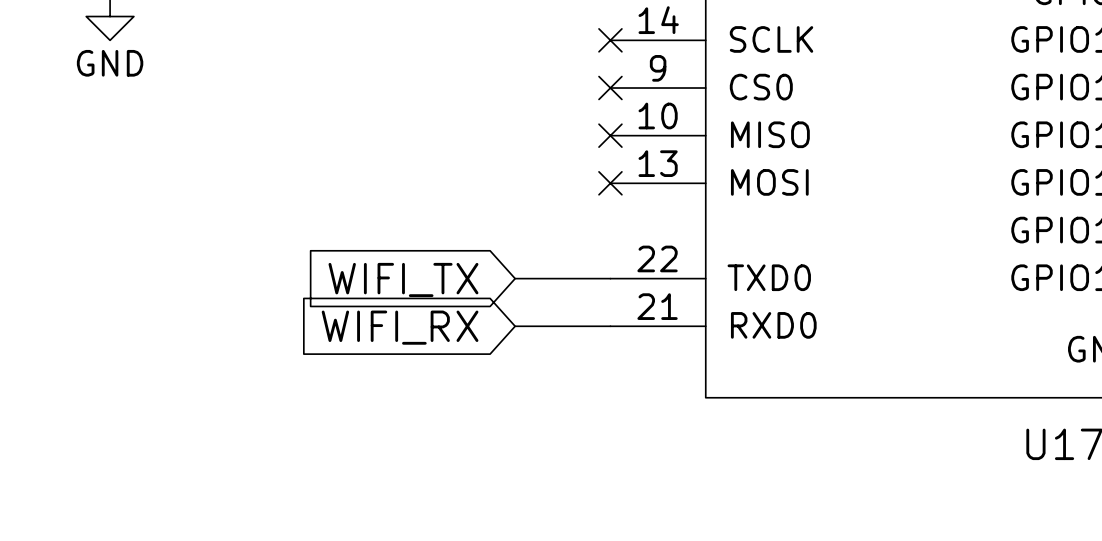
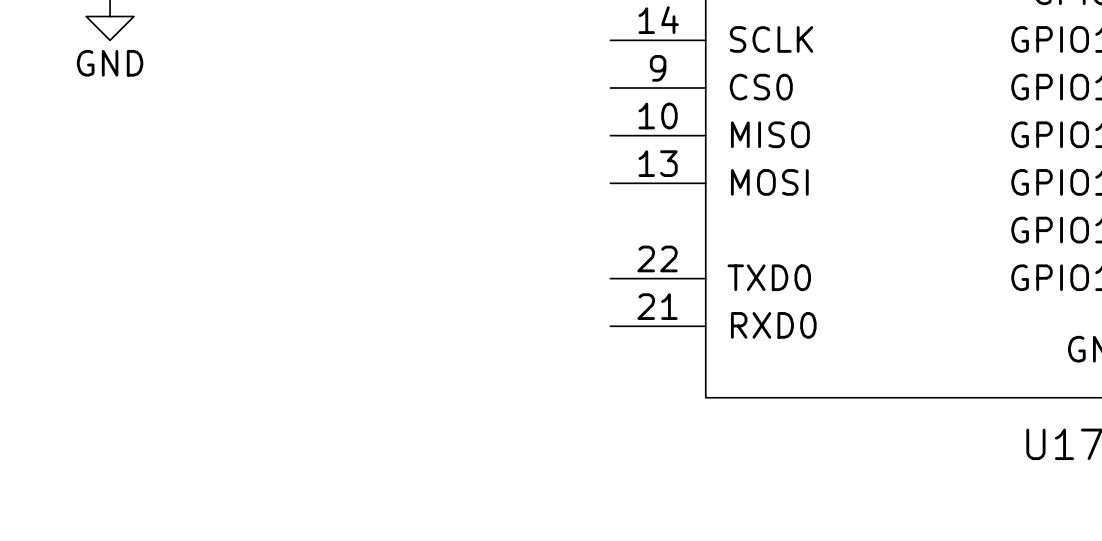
no-connect mark: (610, 40) -> none
no-connect mark: (610, 88) -> none
no-connect mark: (610, 135) -> none
no-connect mark: (610, 183) -> none
wire: (515, 278) (610, 278) -> none
global label: WIFI_TX (403, 279) -> none
wire: (515, 326) (610, 326) -> none
global label: WIFI_RX (400, 327) -> none

